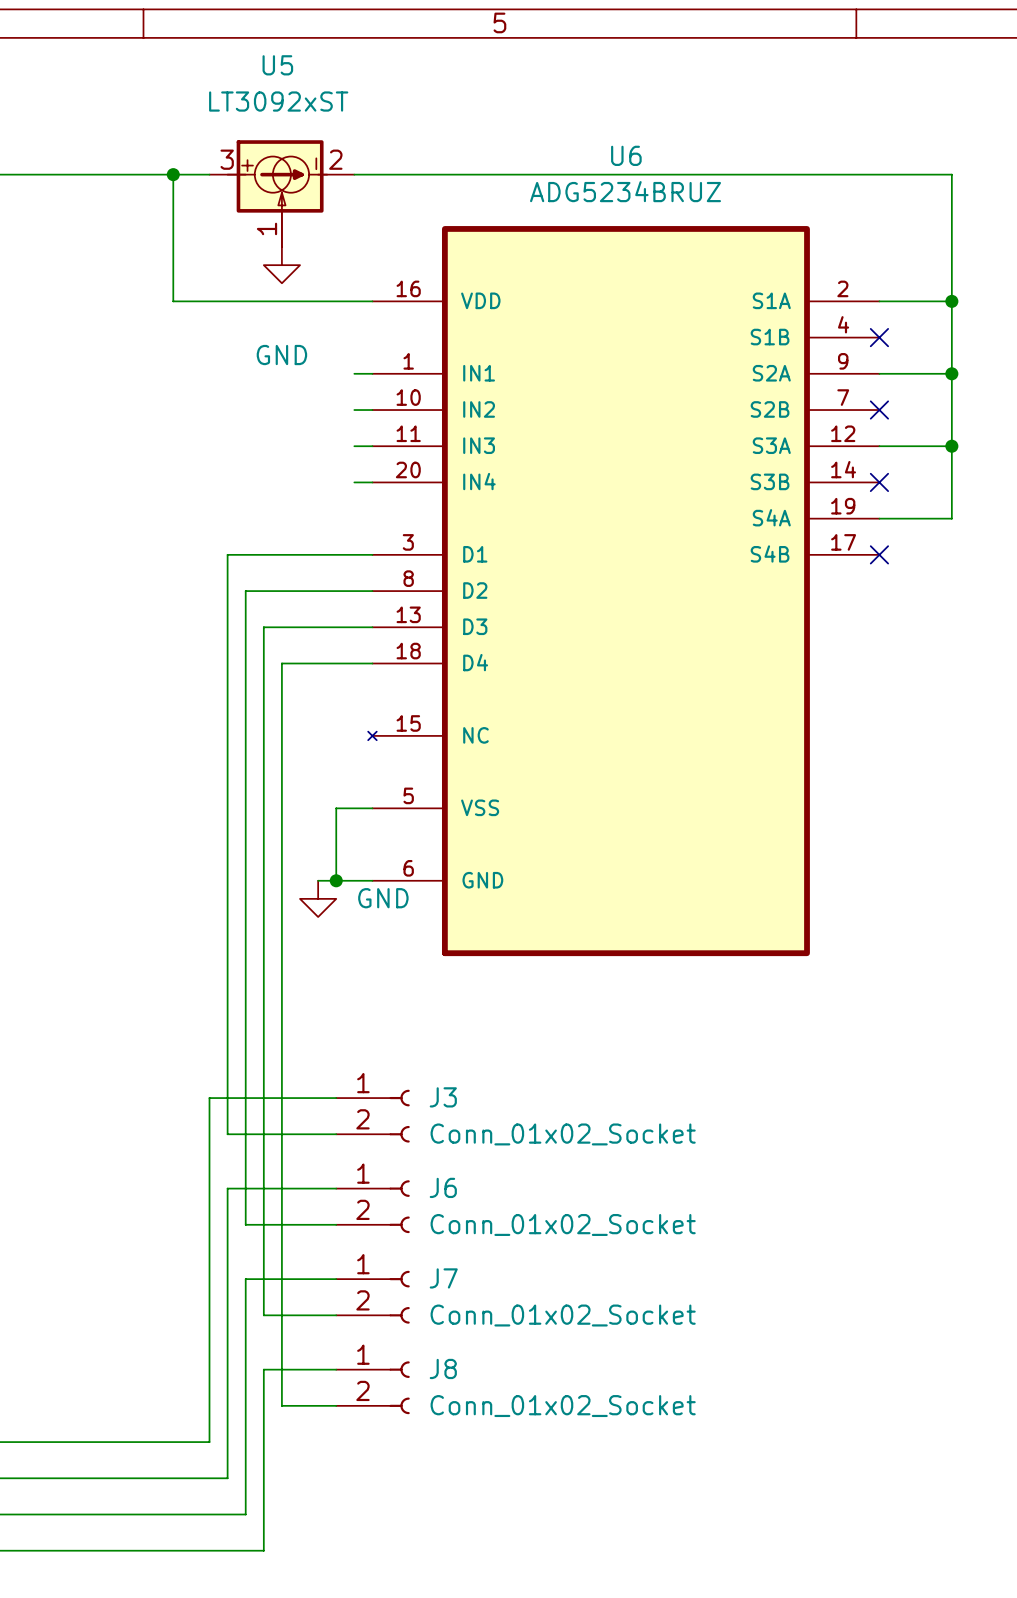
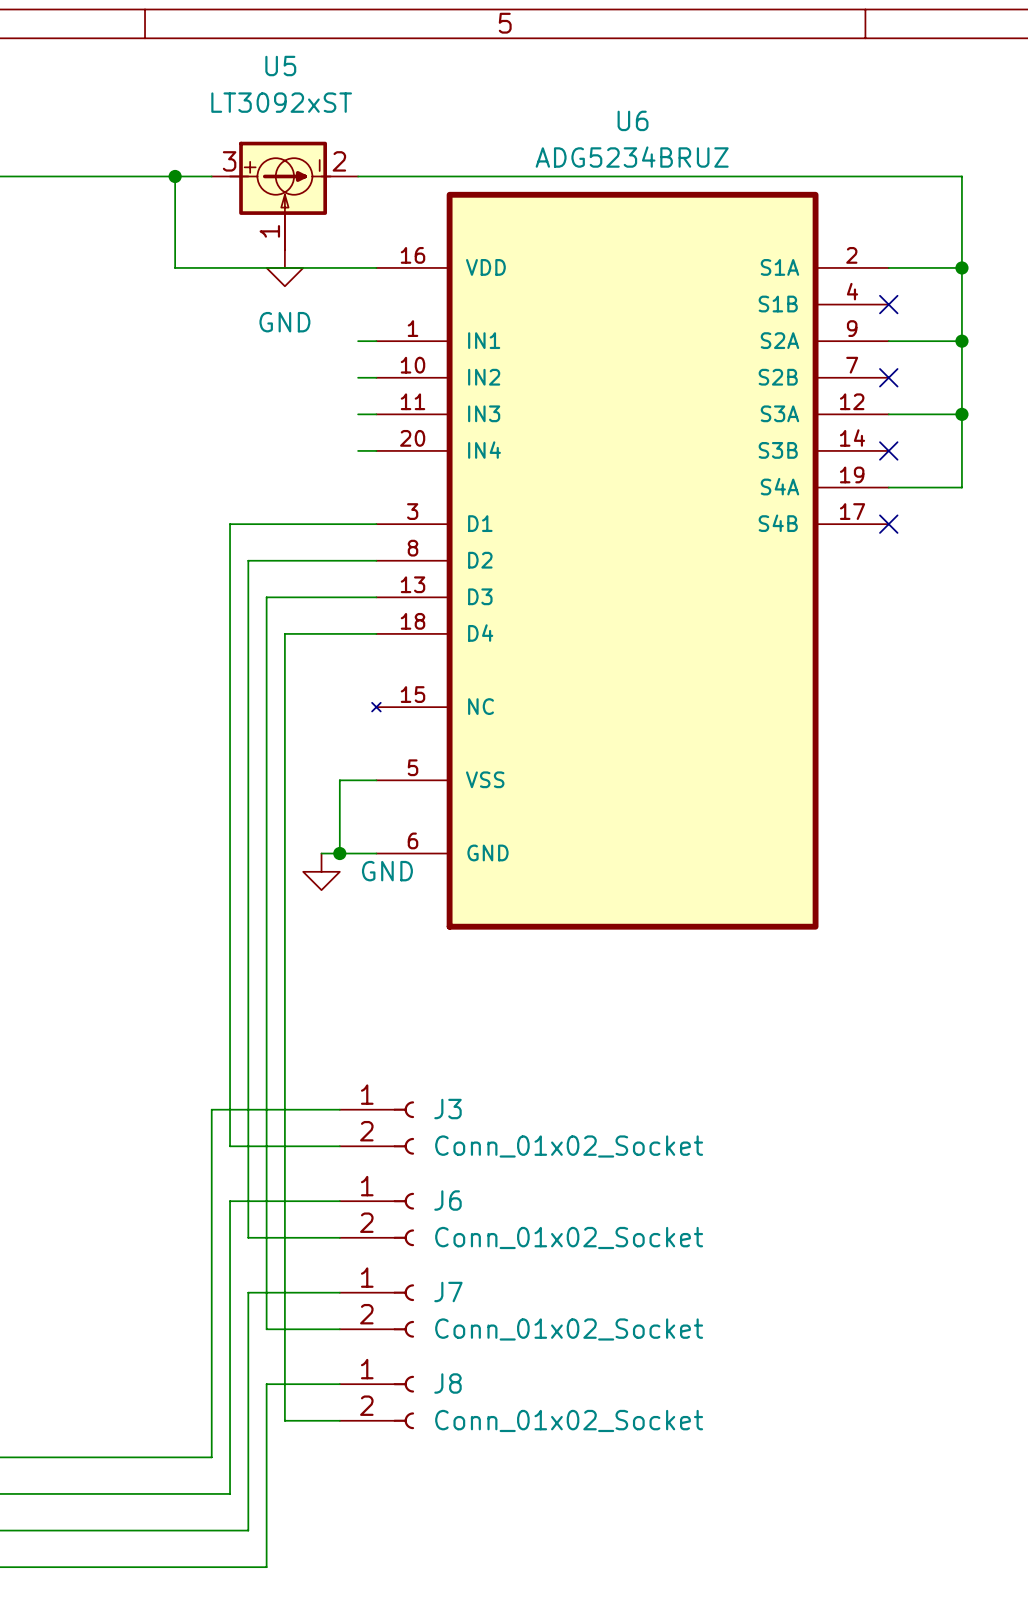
wire: (173, 265) (173, 301) (372, 301) -> (175, 267) (376, 267)
junction: none -> (961, 267)
wire: (879, 301) (951, 301) -> (888, 267) (961, 267)
no-connect mark: none -> (888, 304)
junction: (951, 301) -> none
no-connect mark: (879, 337) -> none
junction: none -> (961, 341)
power symbol text position: GND (281, 355) -> GND (284, 322)
wire: (879, 373) (951, 373) -> (888, 341) (961, 341)
no-connect mark: none -> (888, 377)
junction: (951, 373) -> none
no-connect mark: (879, 410) -> none
junction: none -> (961, 414)
wire: (879, 446) (951, 446) -> (888, 414) (961, 414)
no-connect mark: none -> (888, 450)
junction: (951, 446) -> none
wire: (354, 482) (372, 482) -> (358, 341) (376, 341)
no-connect mark: (879, 482) -> none
wire: (951, 482) (951, 518) (879, 518) -> (961, 487) (888, 487)
wire: none -> (376, 524) (230, 524) (230, 560)
no-connect mark: none -> (888, 524)
wire: (227, 554) (245, 554) -> (248, 597) (248, 560)
no-connect mark: (879, 554) -> none
wire: (245, 591) (263, 591) -> (266, 633) (266, 597)
U6 position: (623, 591) -> (630, 560)
wire: (263, 627) (281, 627) -> (284, 670) (284, 633)
wire: (281, 663) (372, 663) -> none
wire: (336, 808) (372, 808) -> (339, 816) (339, 780) (376, 780)
wire: (336, 844) (336, 880) -> none
wire: (318, 880) (372, 880) -> (321, 853) (376, 853)
junction position: (336, 880) -> (339, 853)
power symbol position: GND (318, 898) -> GND (321, 871)

